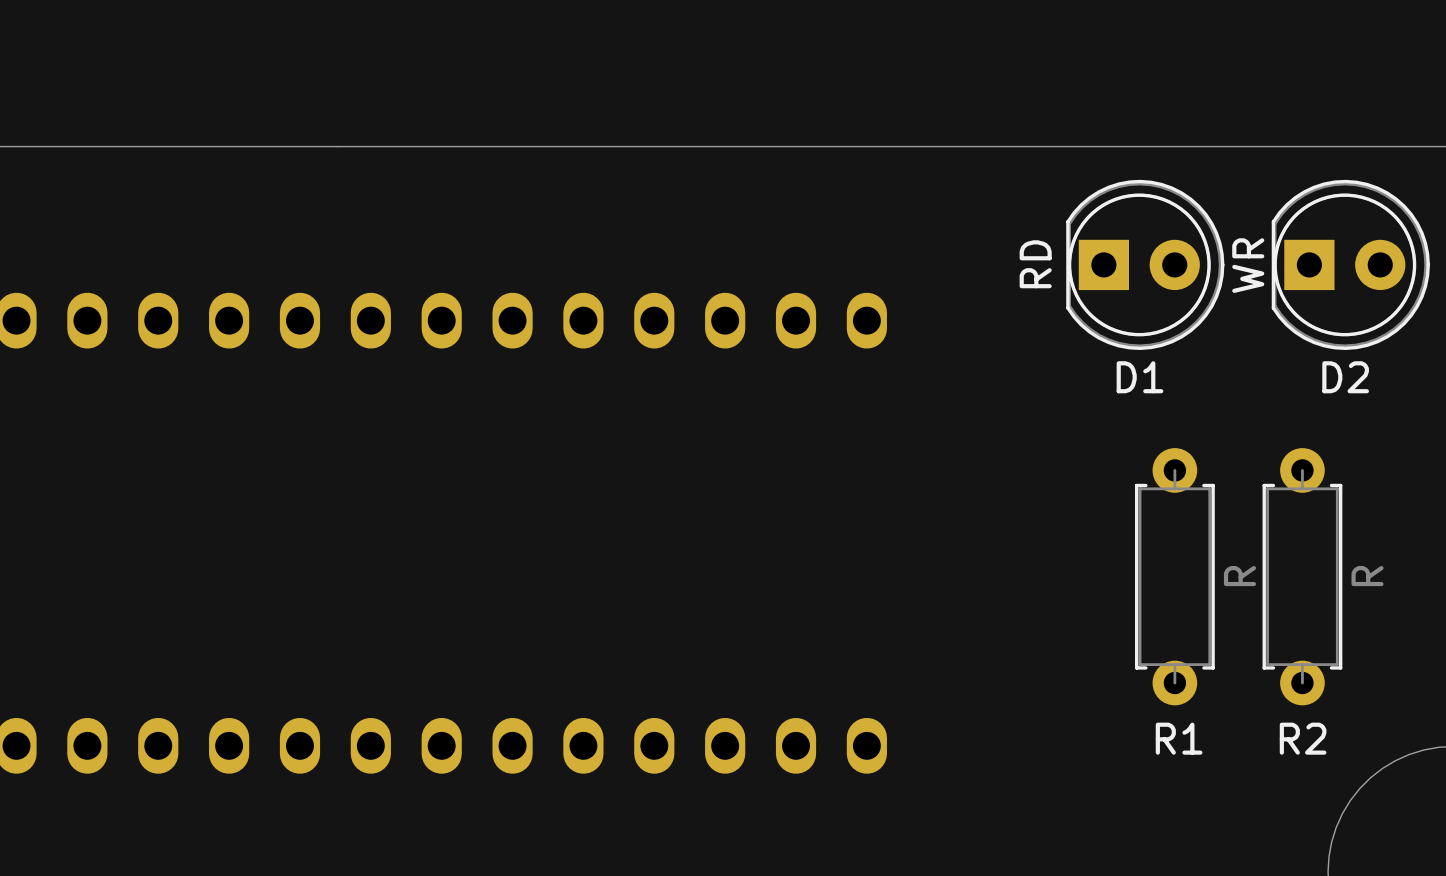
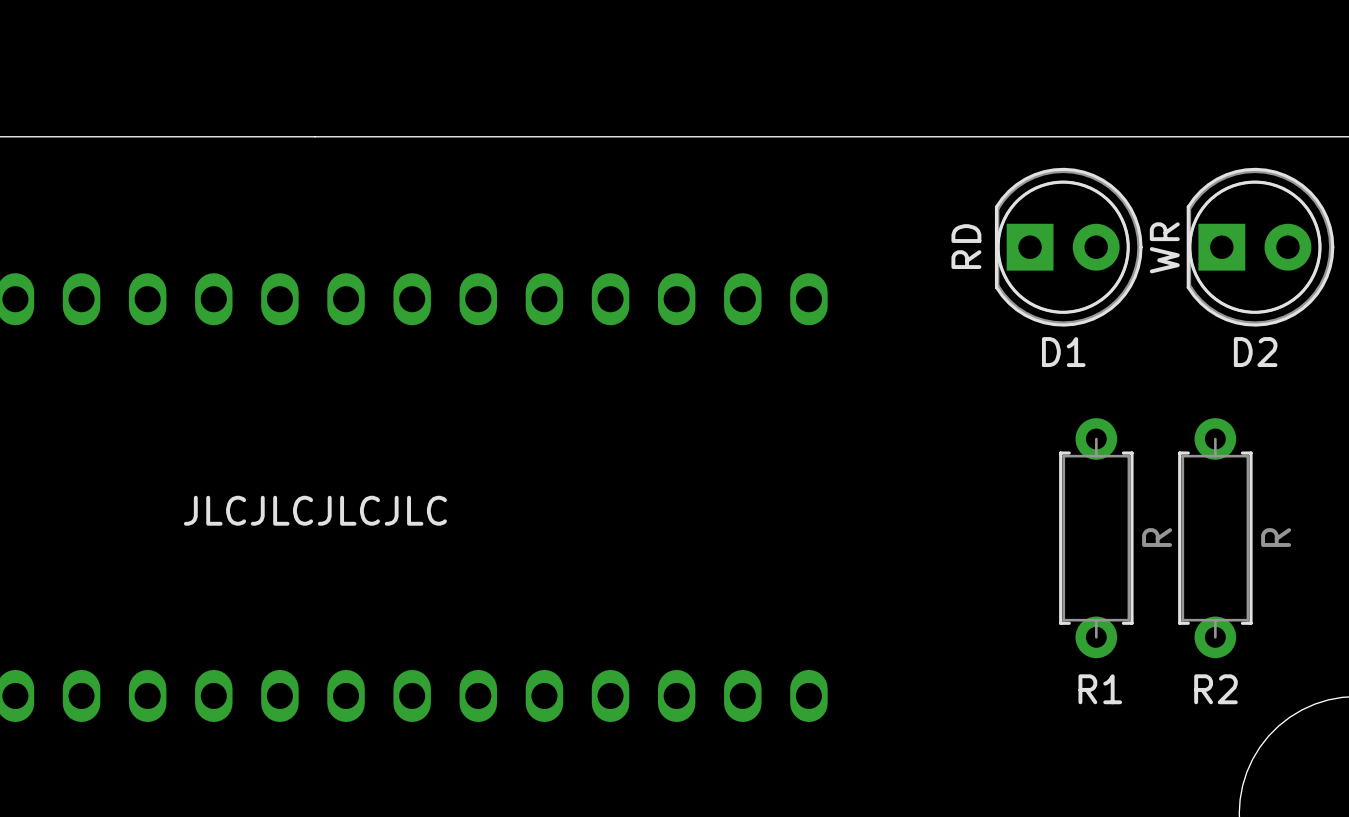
text: none -> JLCJLCJLCJLC (315, 510)

